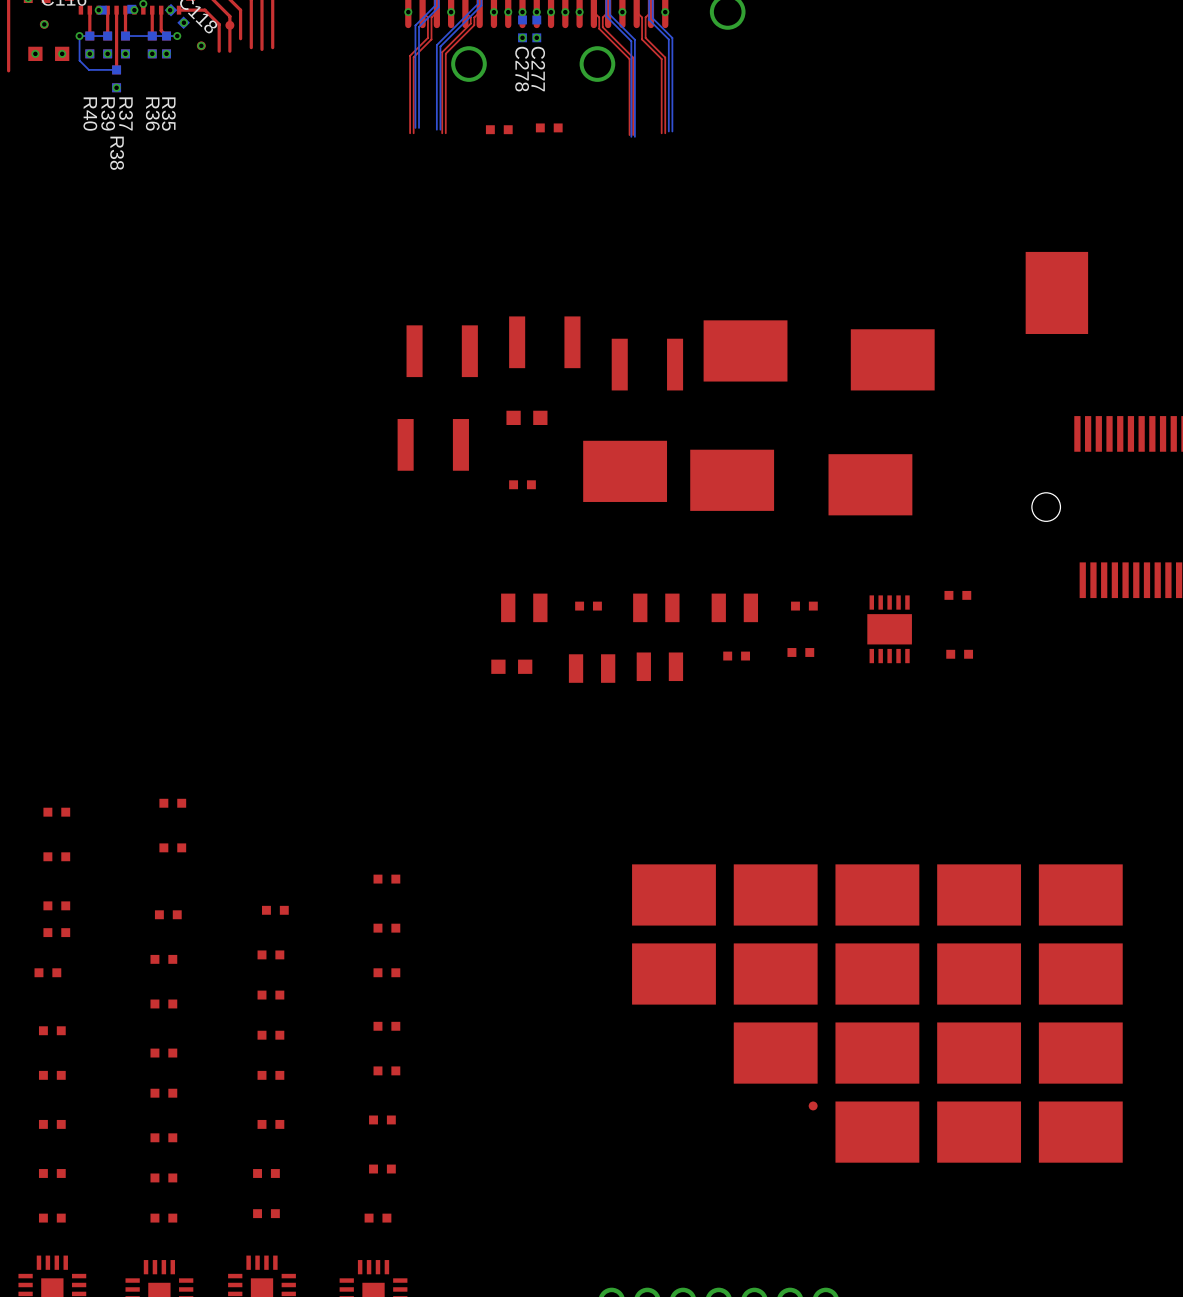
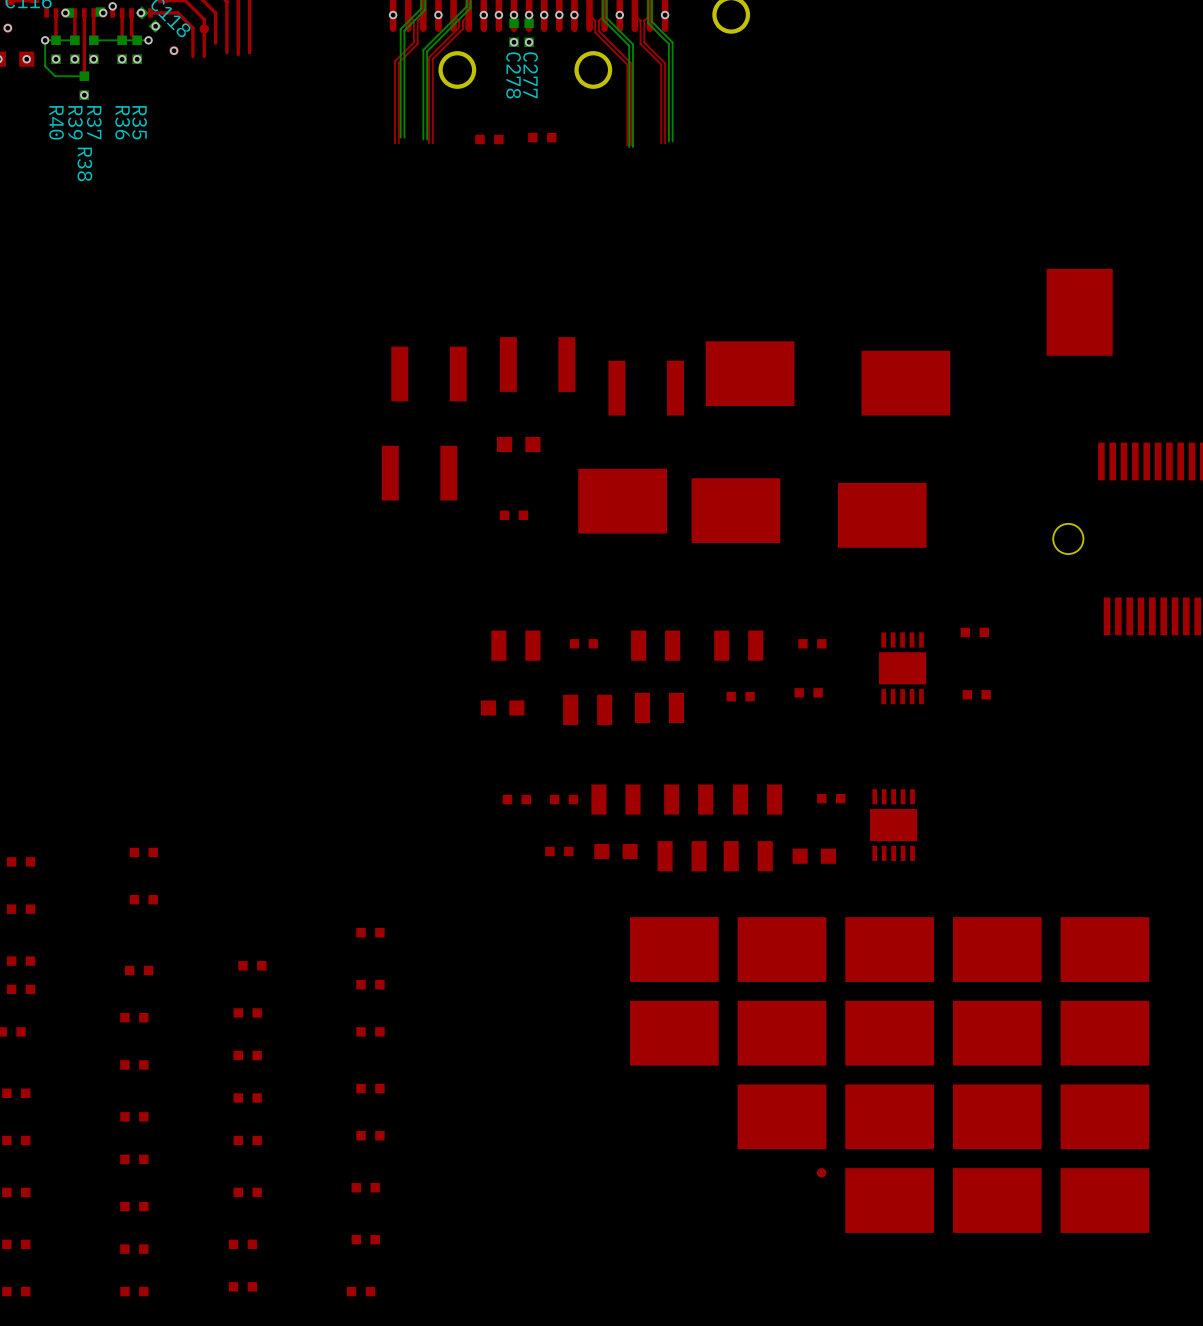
part: none -> (831, 798)
part: none -> (516, 799)
part: none -> (564, 799)
part: none -> (615, 799)
part: none -> (688, 799)
part: none -> (757, 799)
part: none -> (893, 825)
part: none -> (559, 851)
part: none -> (615, 851)
part: none -> (682, 856)
part: none -> (748, 856)
part: none -> (814, 856)

